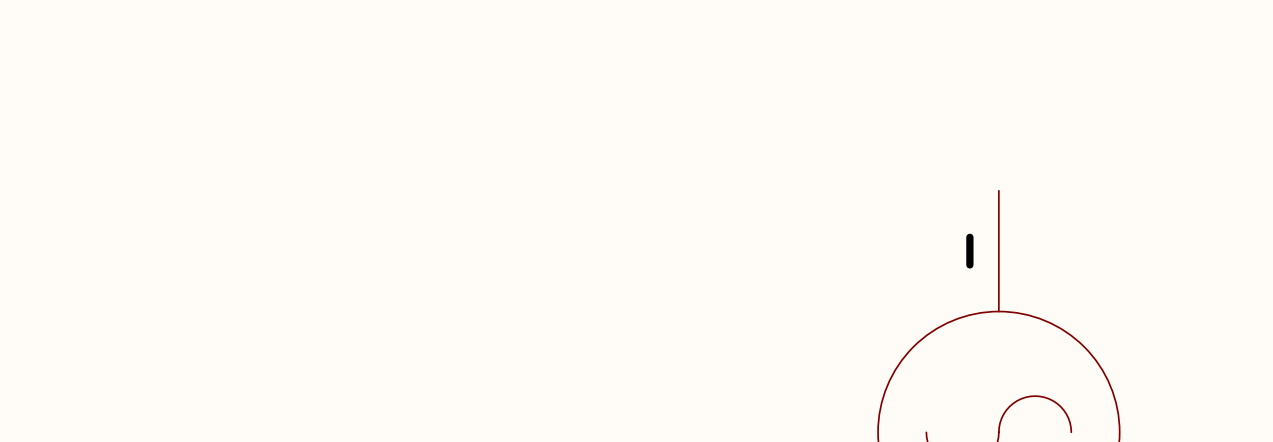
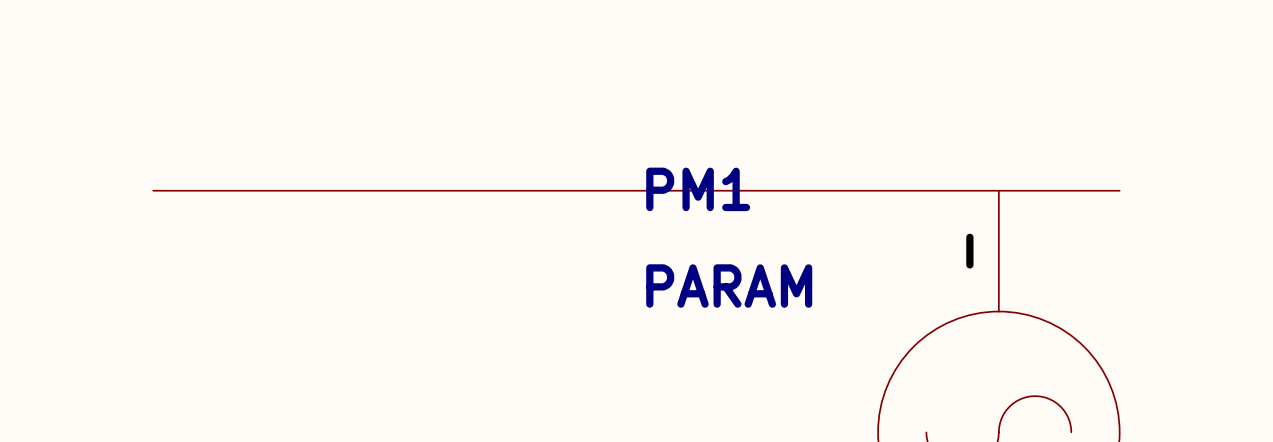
PM1: none -> PARAM (636, 190)

